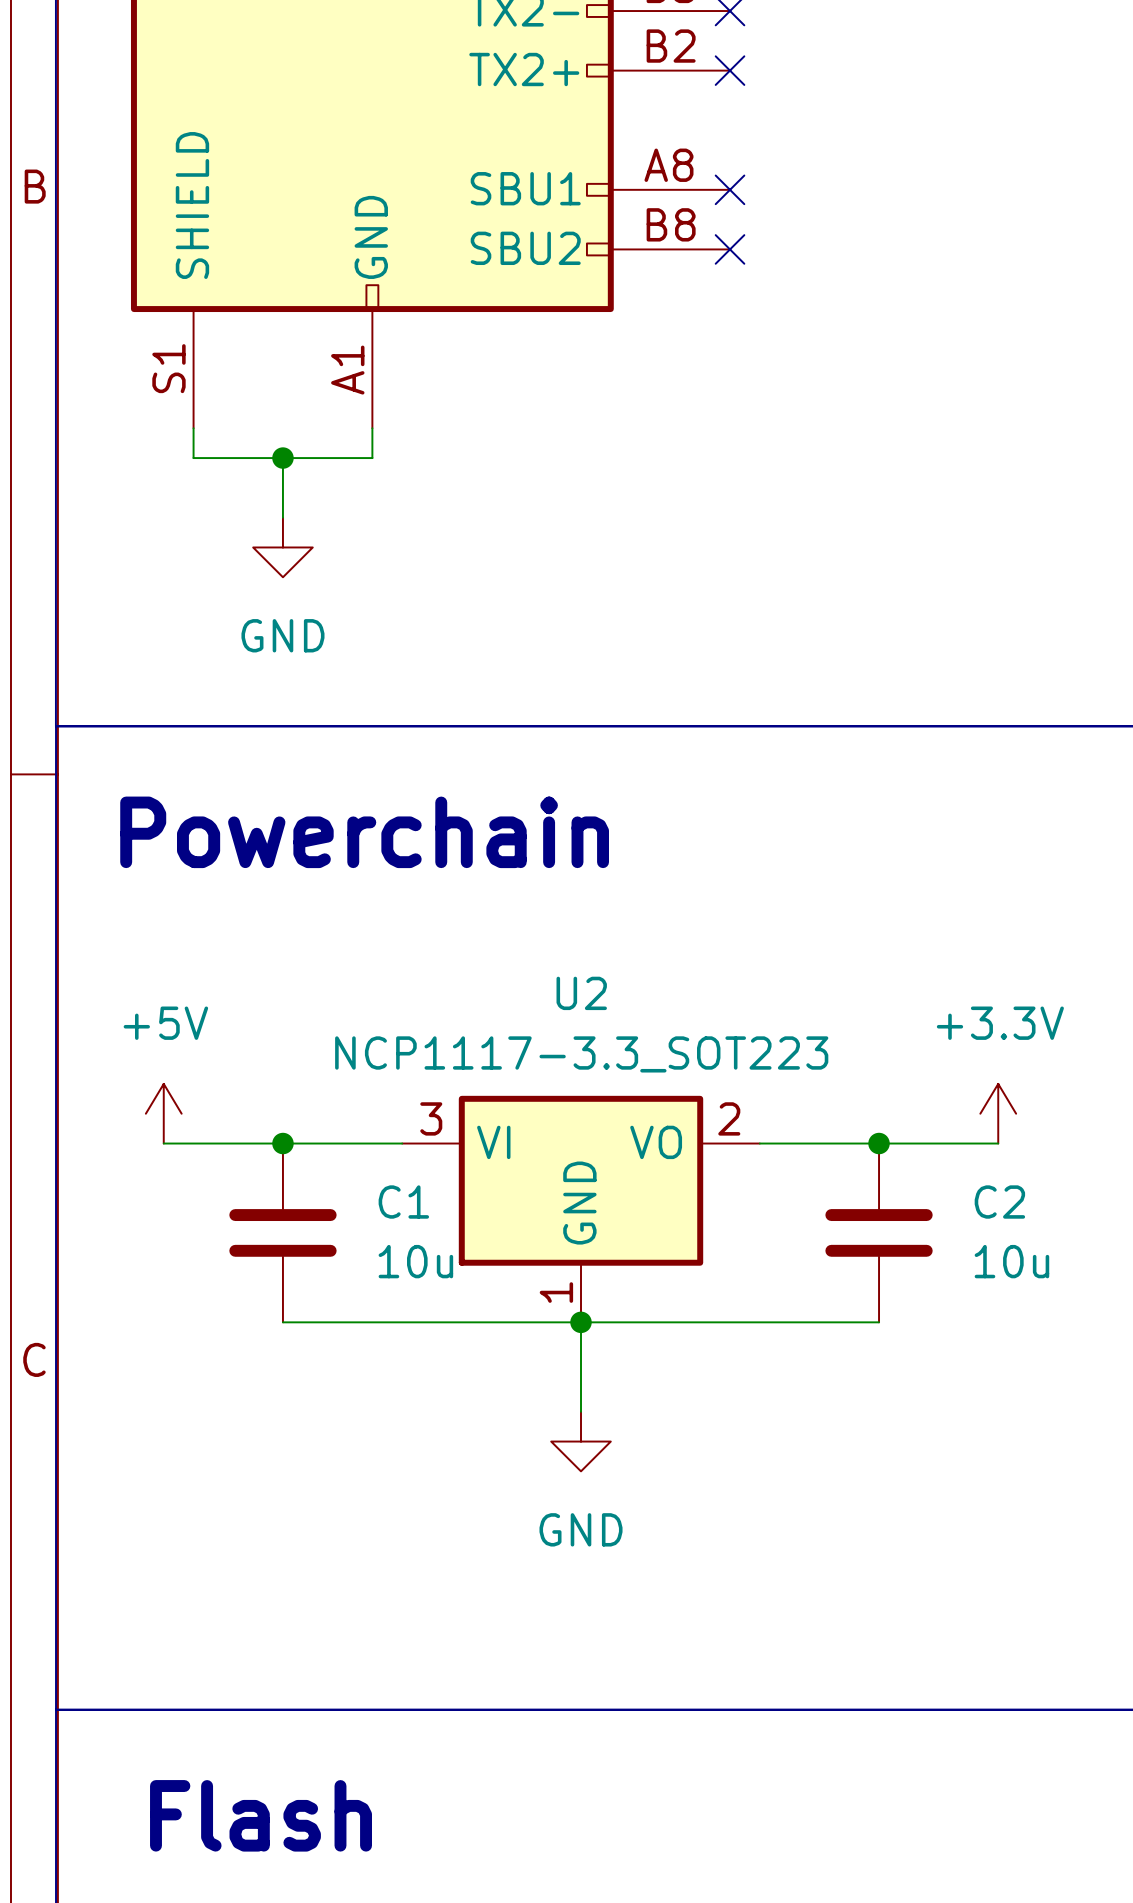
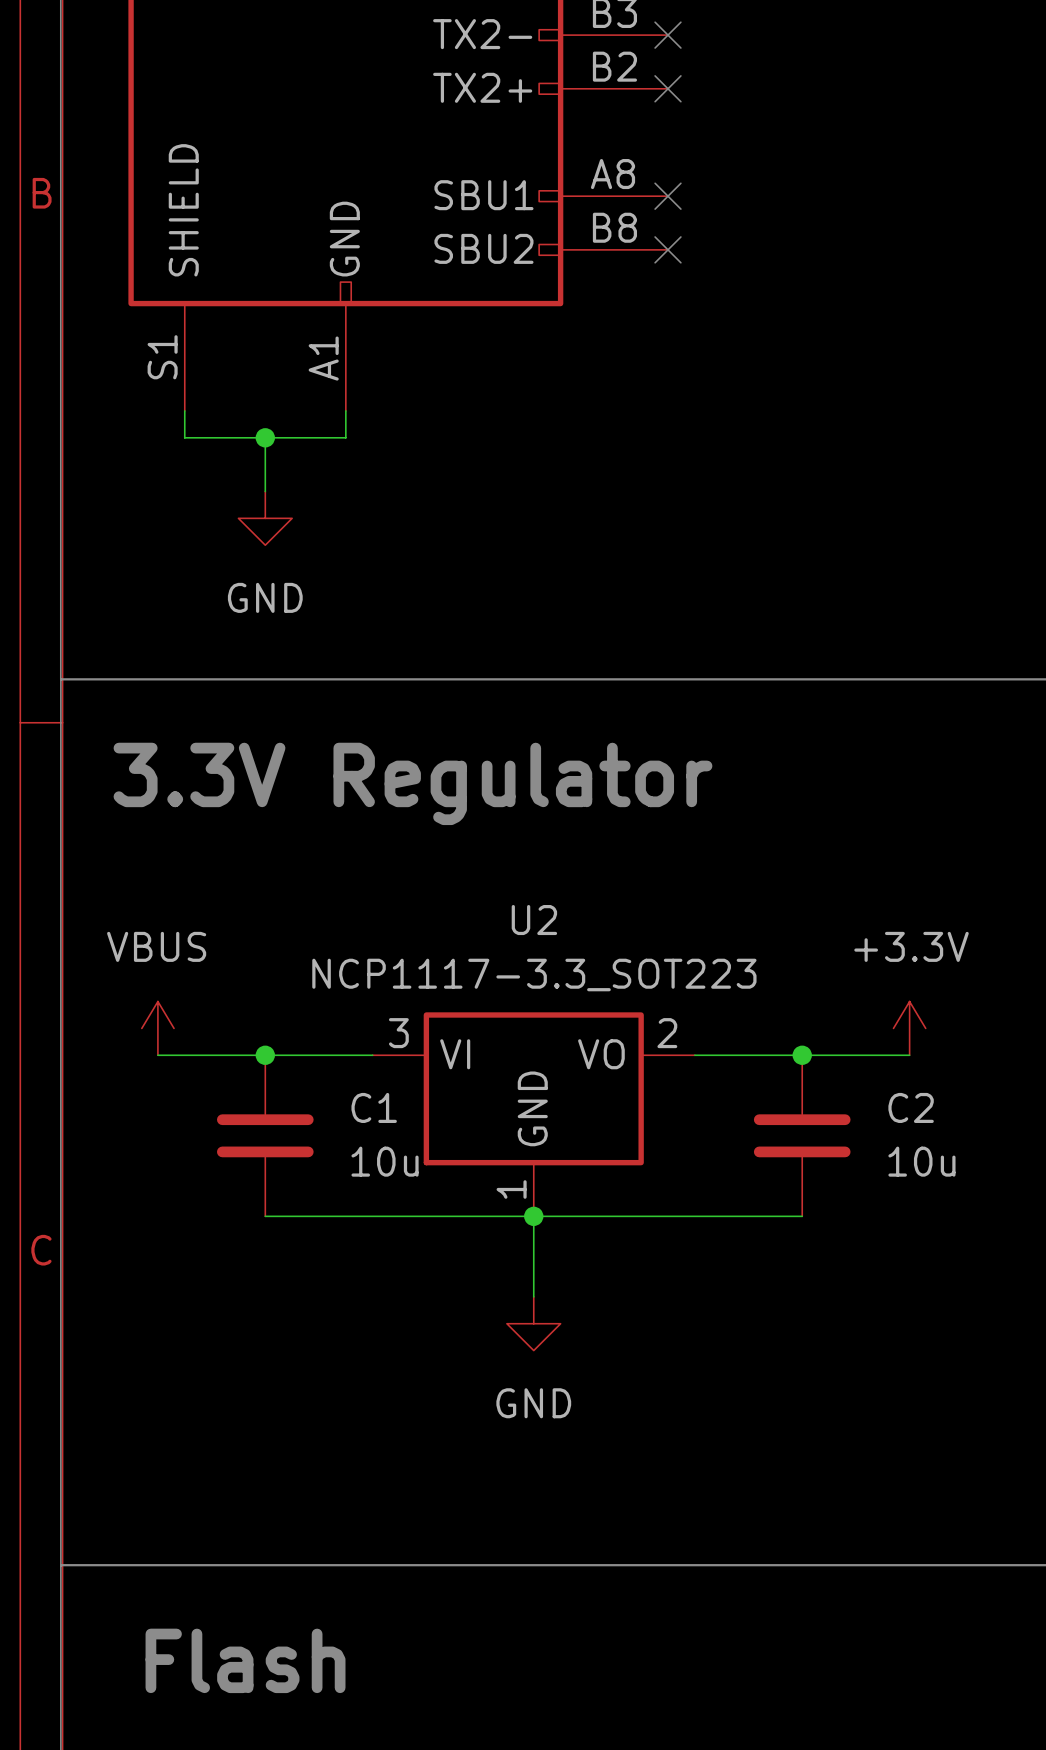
text: Powerchain (364, 832) -> 3.3V Regulator (412, 783)
power symbol: +5V (163, 1113) -> VBUS (157, 1028)

